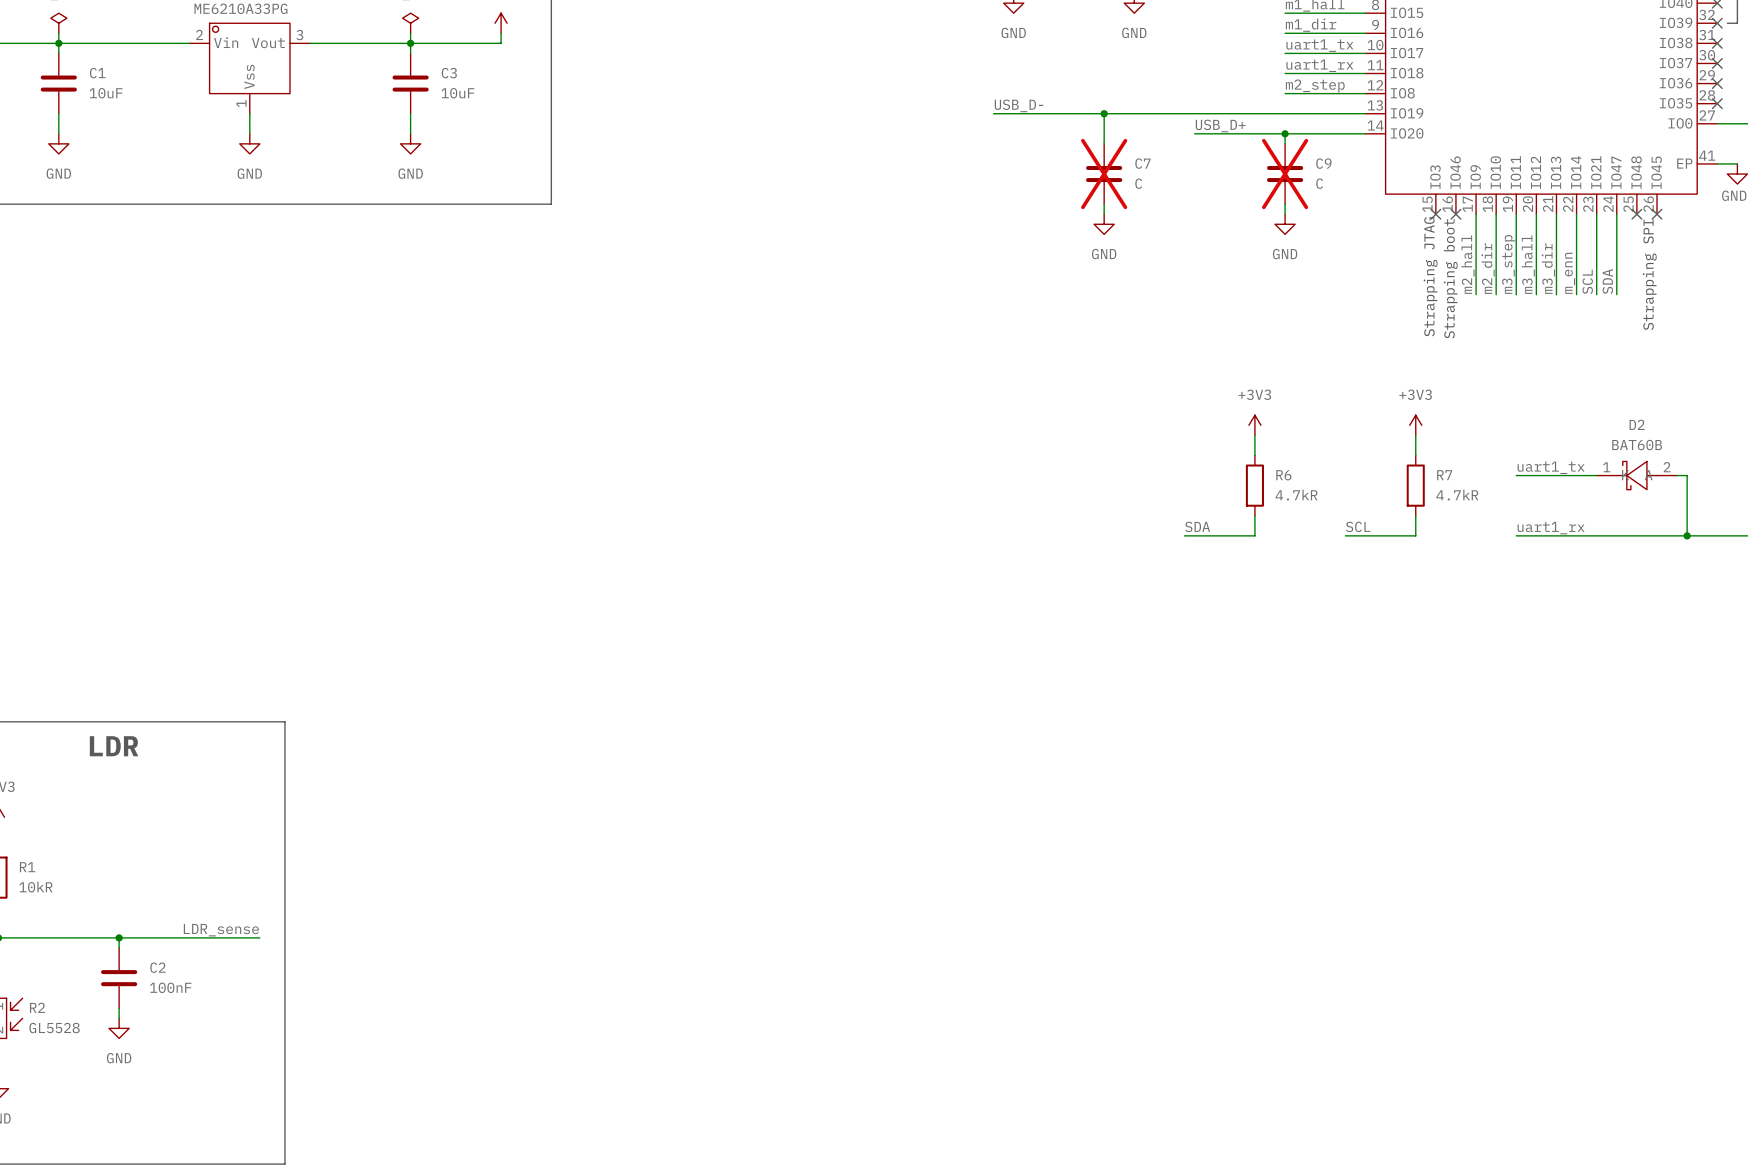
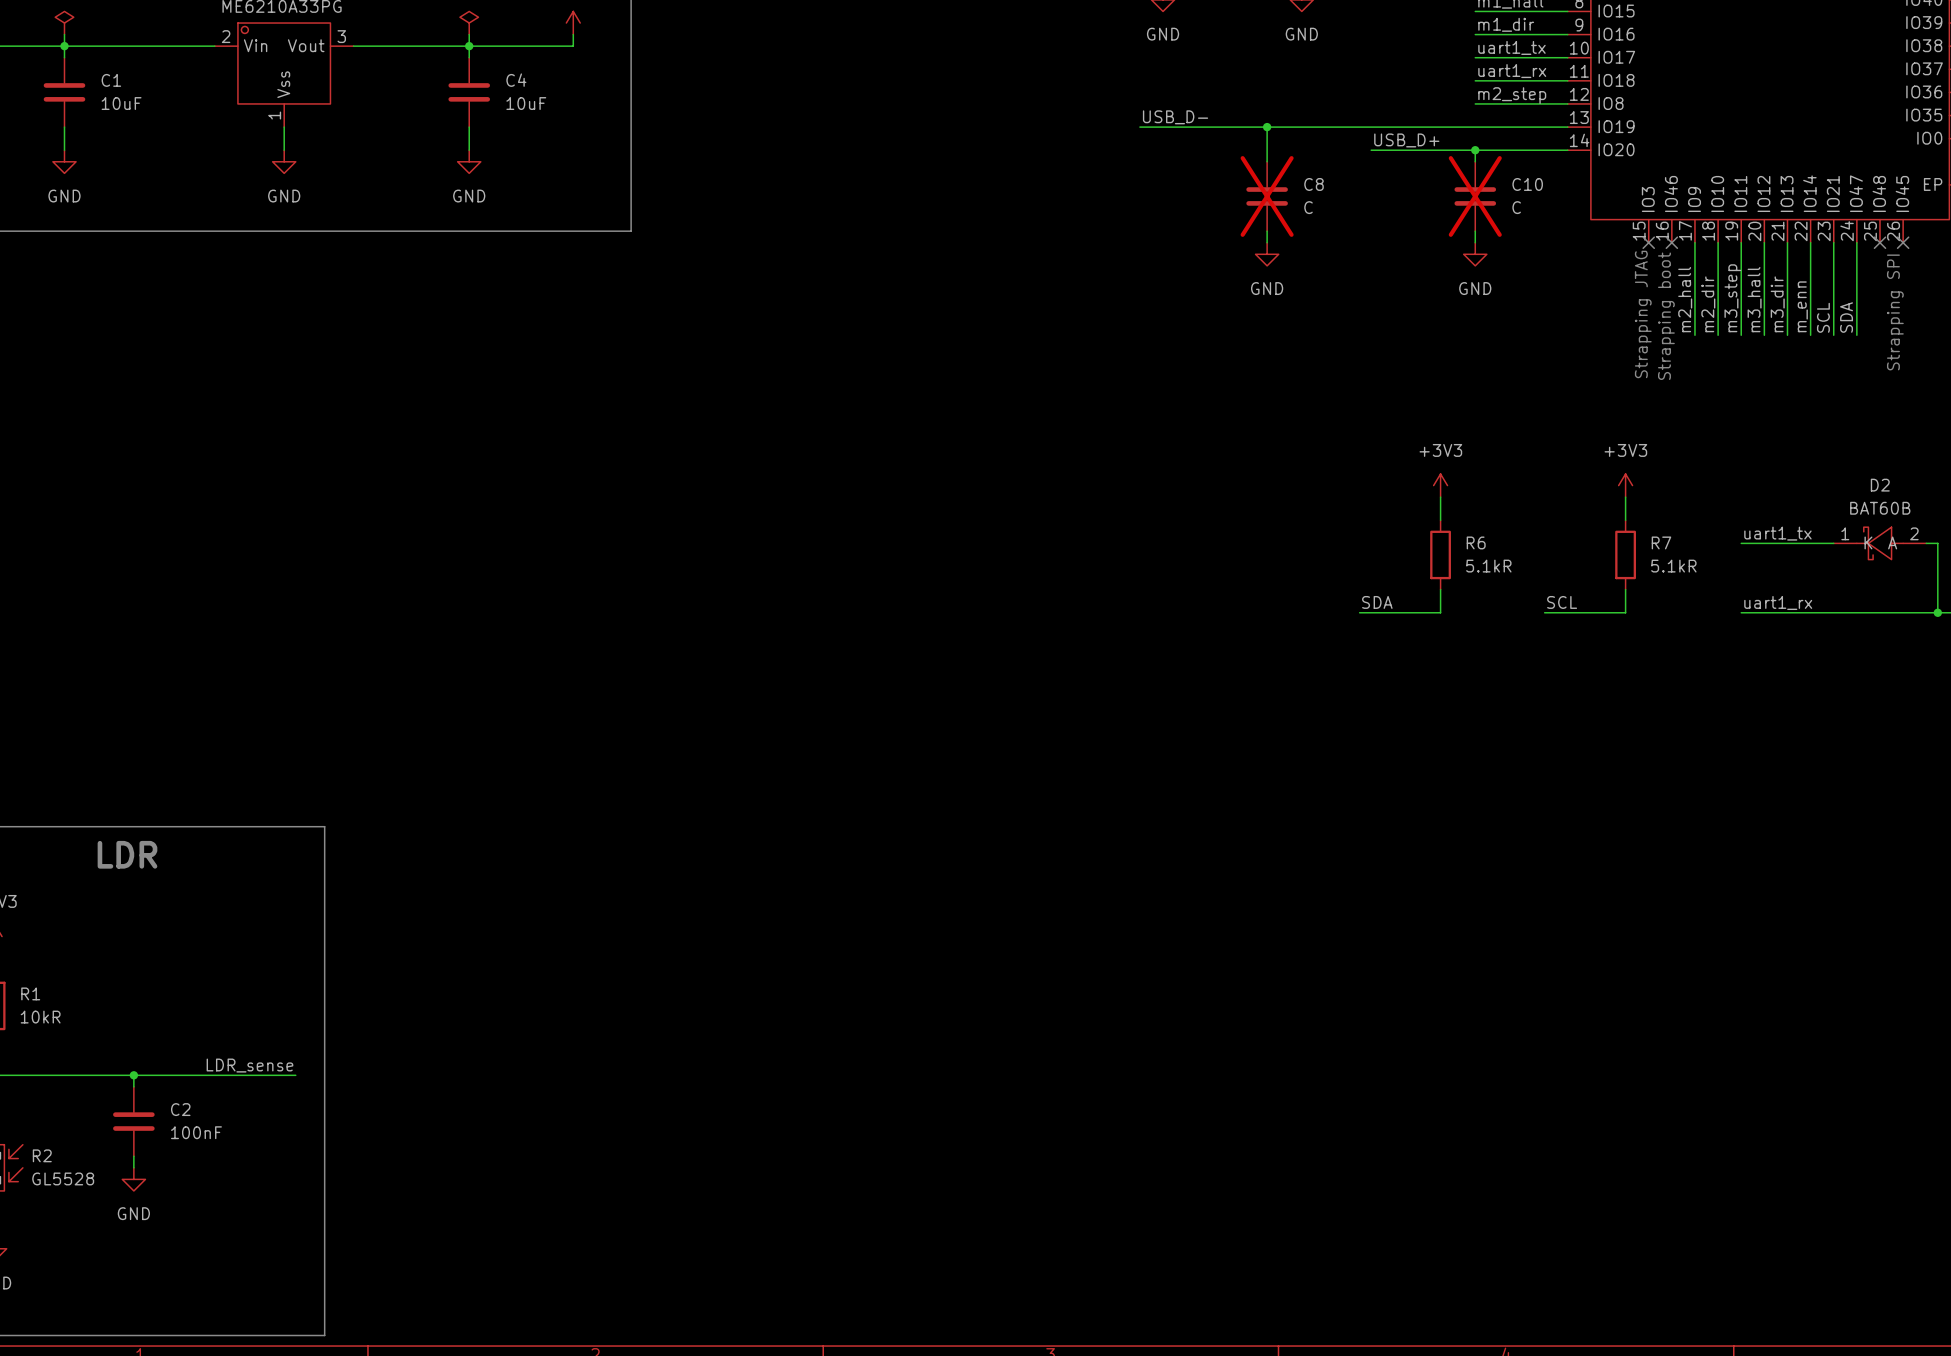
C3 name: C3 (449, 73) -> C4 (516, 80)
C7 name: C7 (1142, 163) -> C8 (1314, 184)
C9 name: C9 (1323, 163) -> C10 (1527, 184)
R6 value: 4.7kR (1296, 495) -> 5.1kR (1488, 566)
R7 value: 4.7kR (1457, 495) -> 5.1kR (1673, 566)

